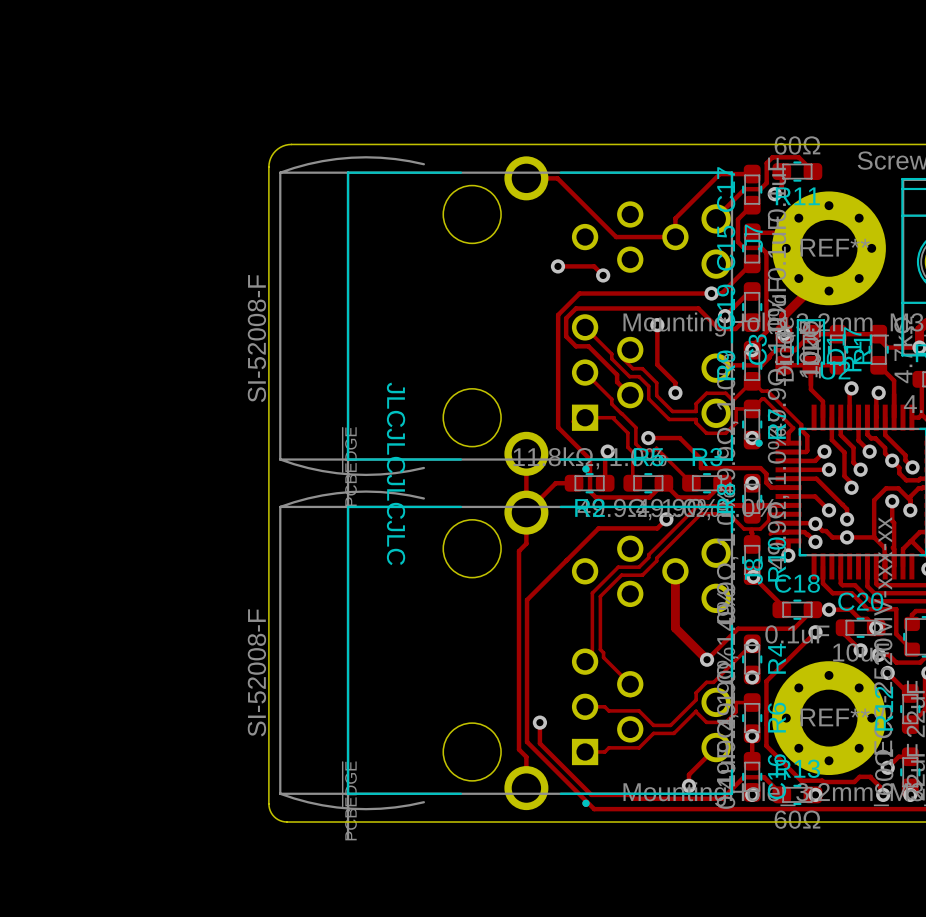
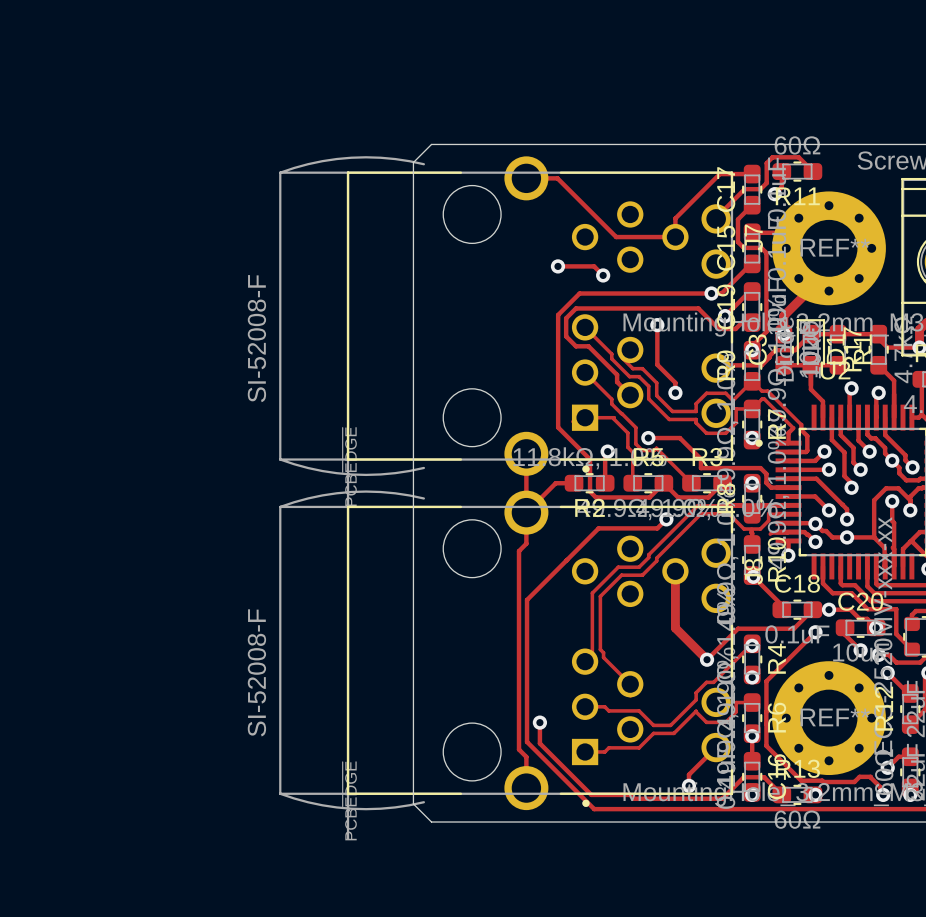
board edge: (431, 144) (288, 144) (280, 147) (273, 153) (268, 167) (269, 808) (275, 818) (284, 821) (431, 822) -> (431, 144) (413, 162) (413, 803) (431, 822)
text: JLCJLCJLCJLC (396, 473) -> none

